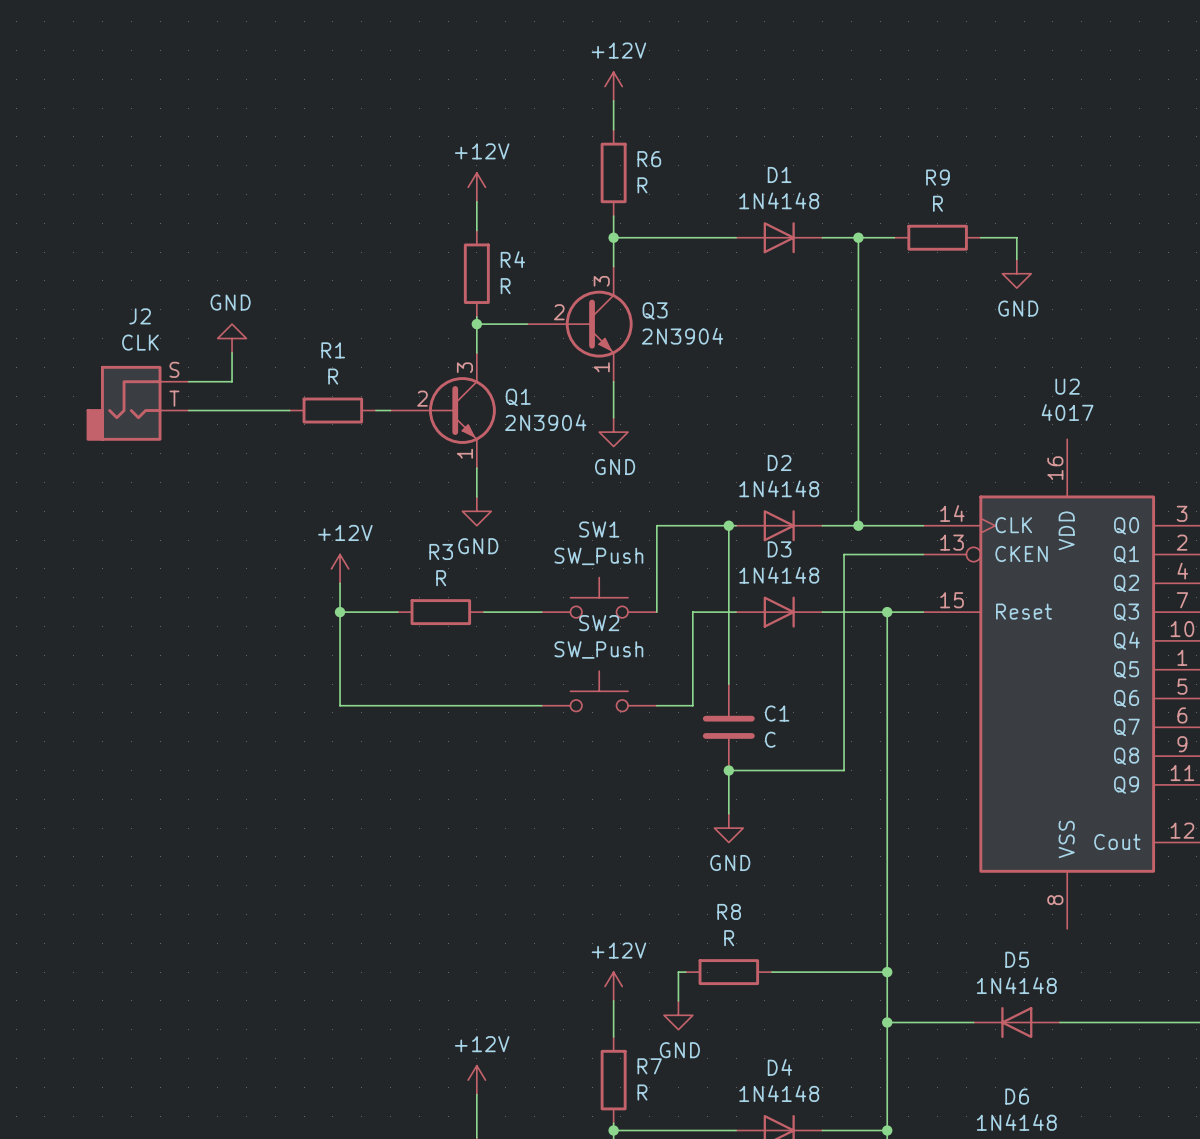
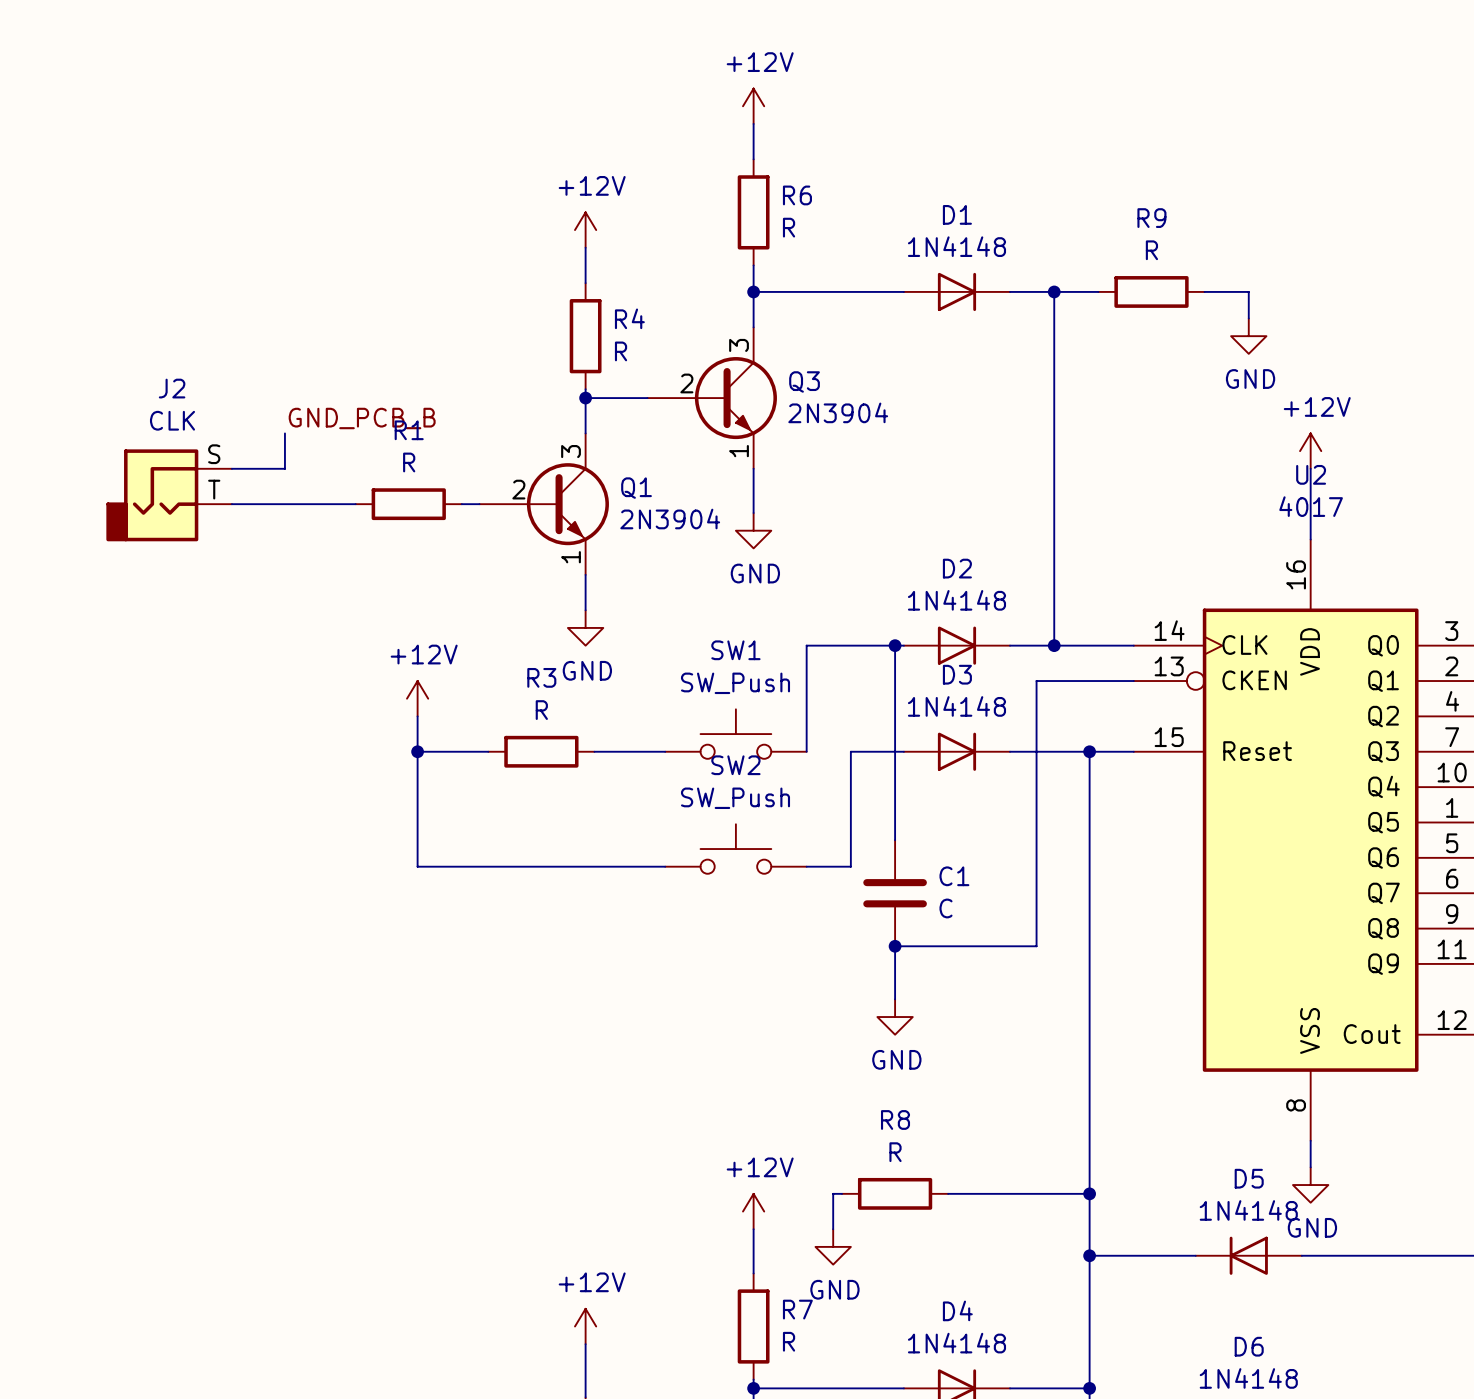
power symbol: GND (232, 338) -> none
label: none -> GND_PCB_B (362, 418)
power symbol: none -> +12V (1310, 451)
wire: none -> (1310, 468) (1310, 539)
wire: none -> (1310, 1140) (1310, 1167)
power symbol: none -> GND (1310, 1185)

